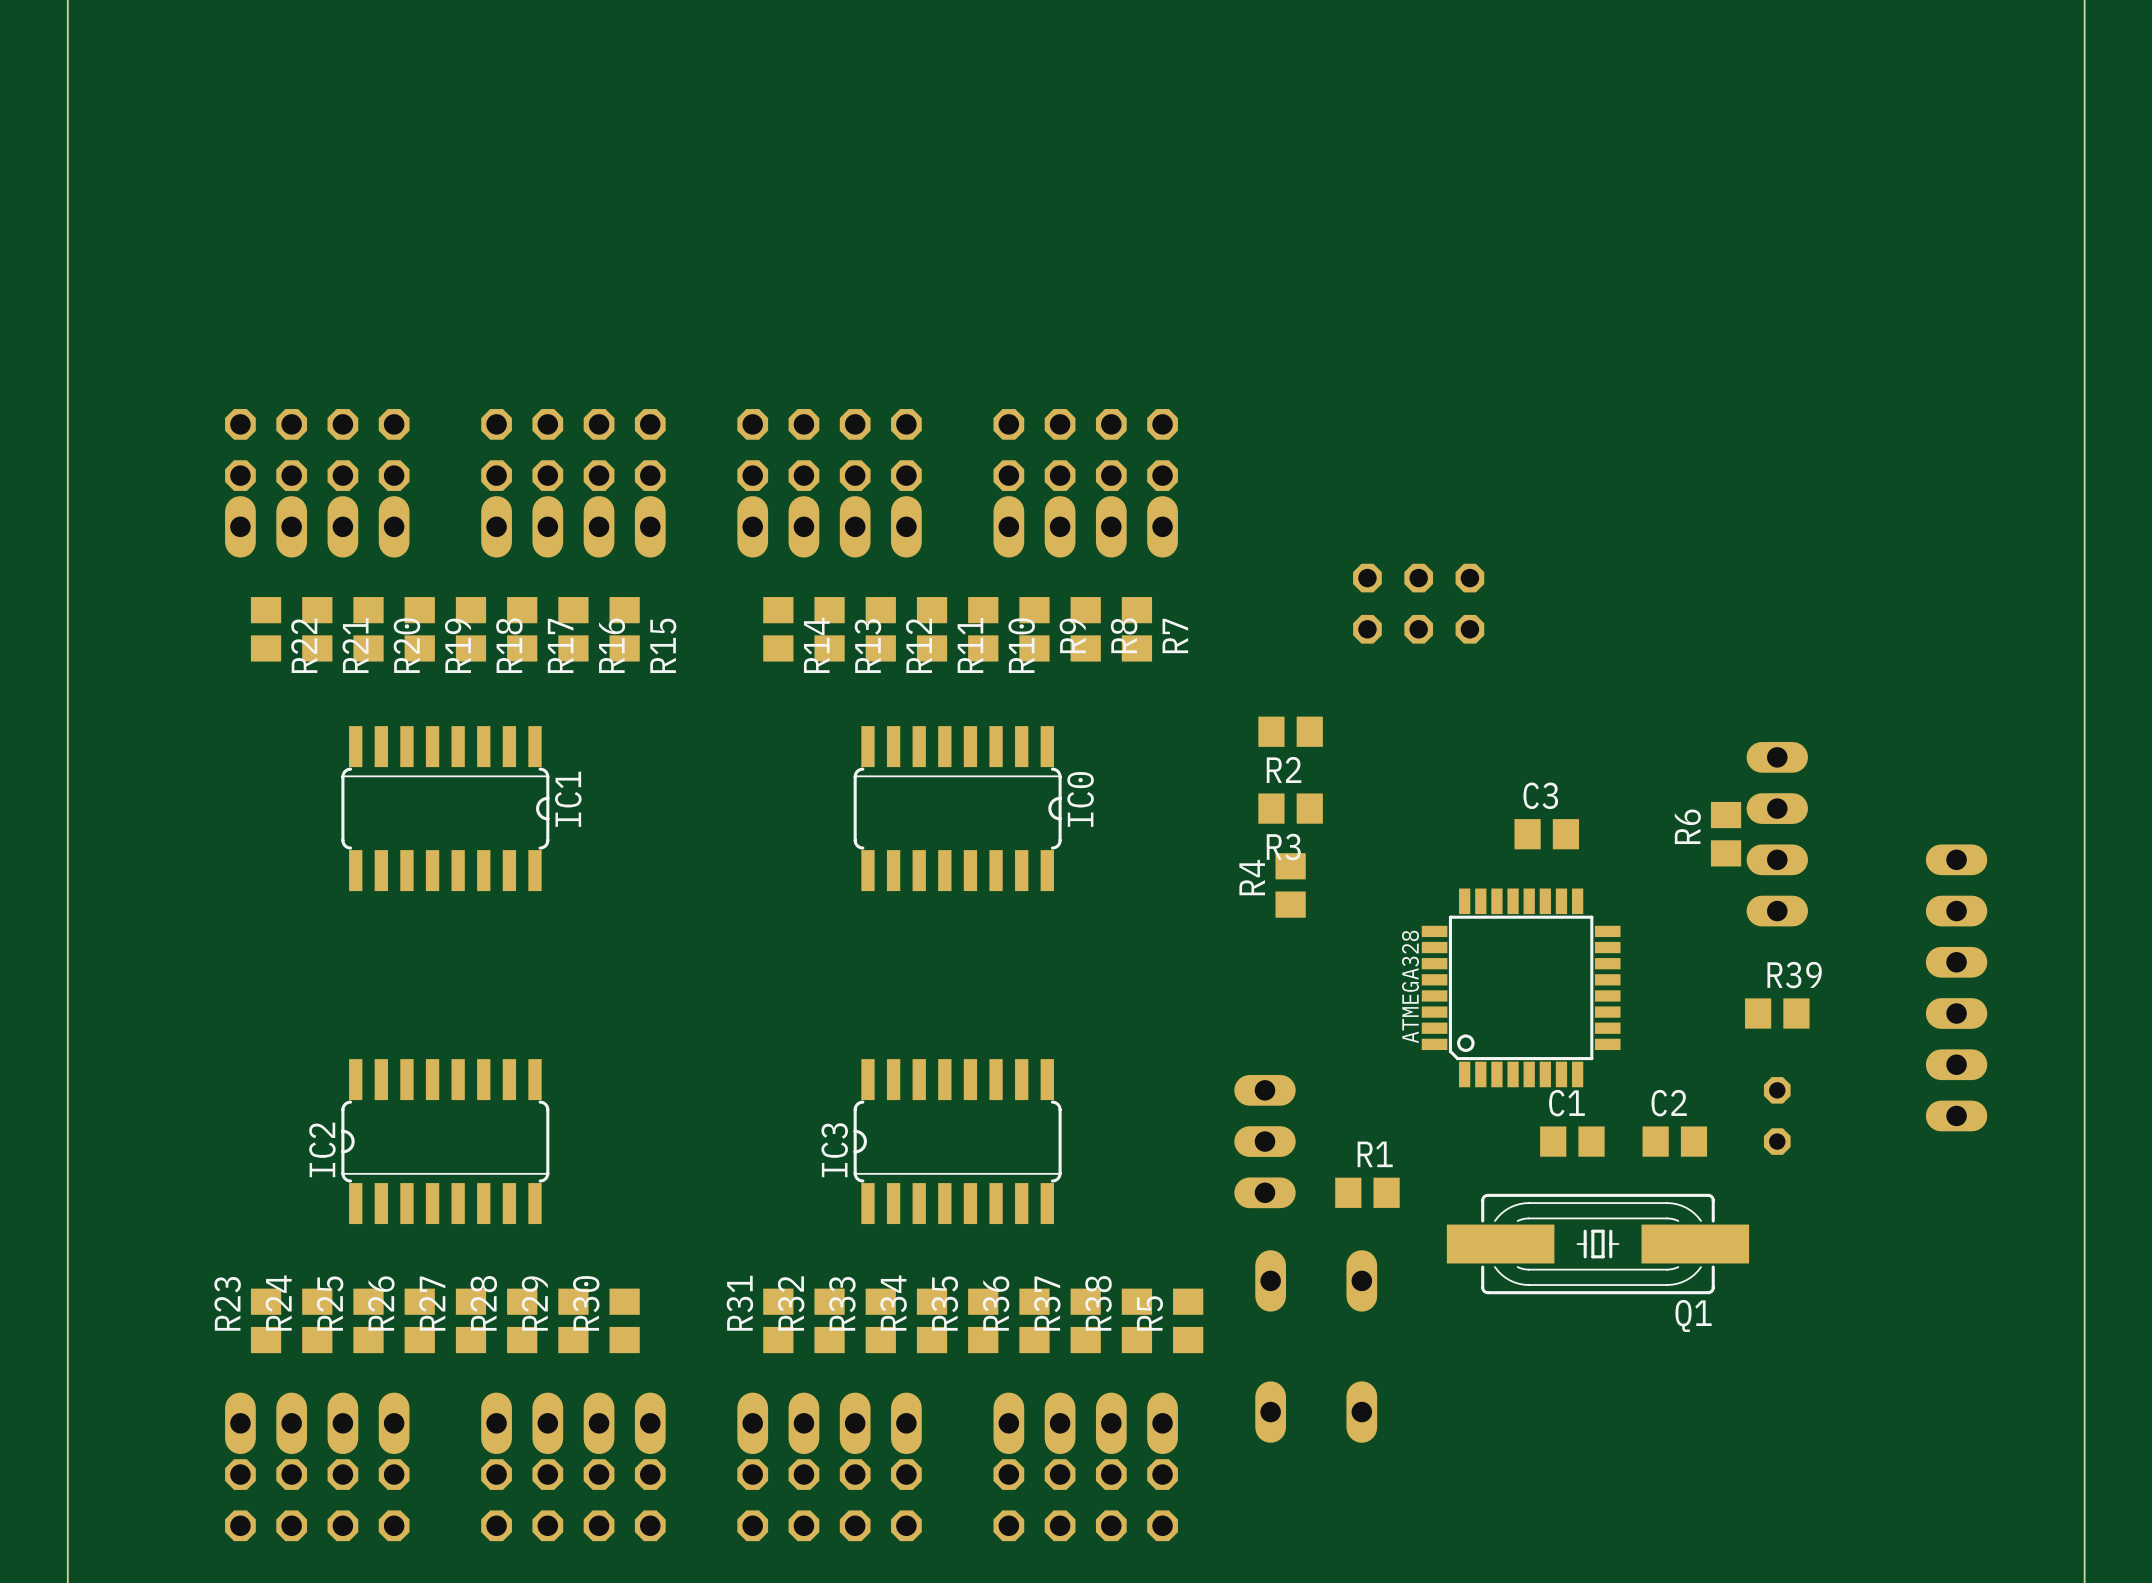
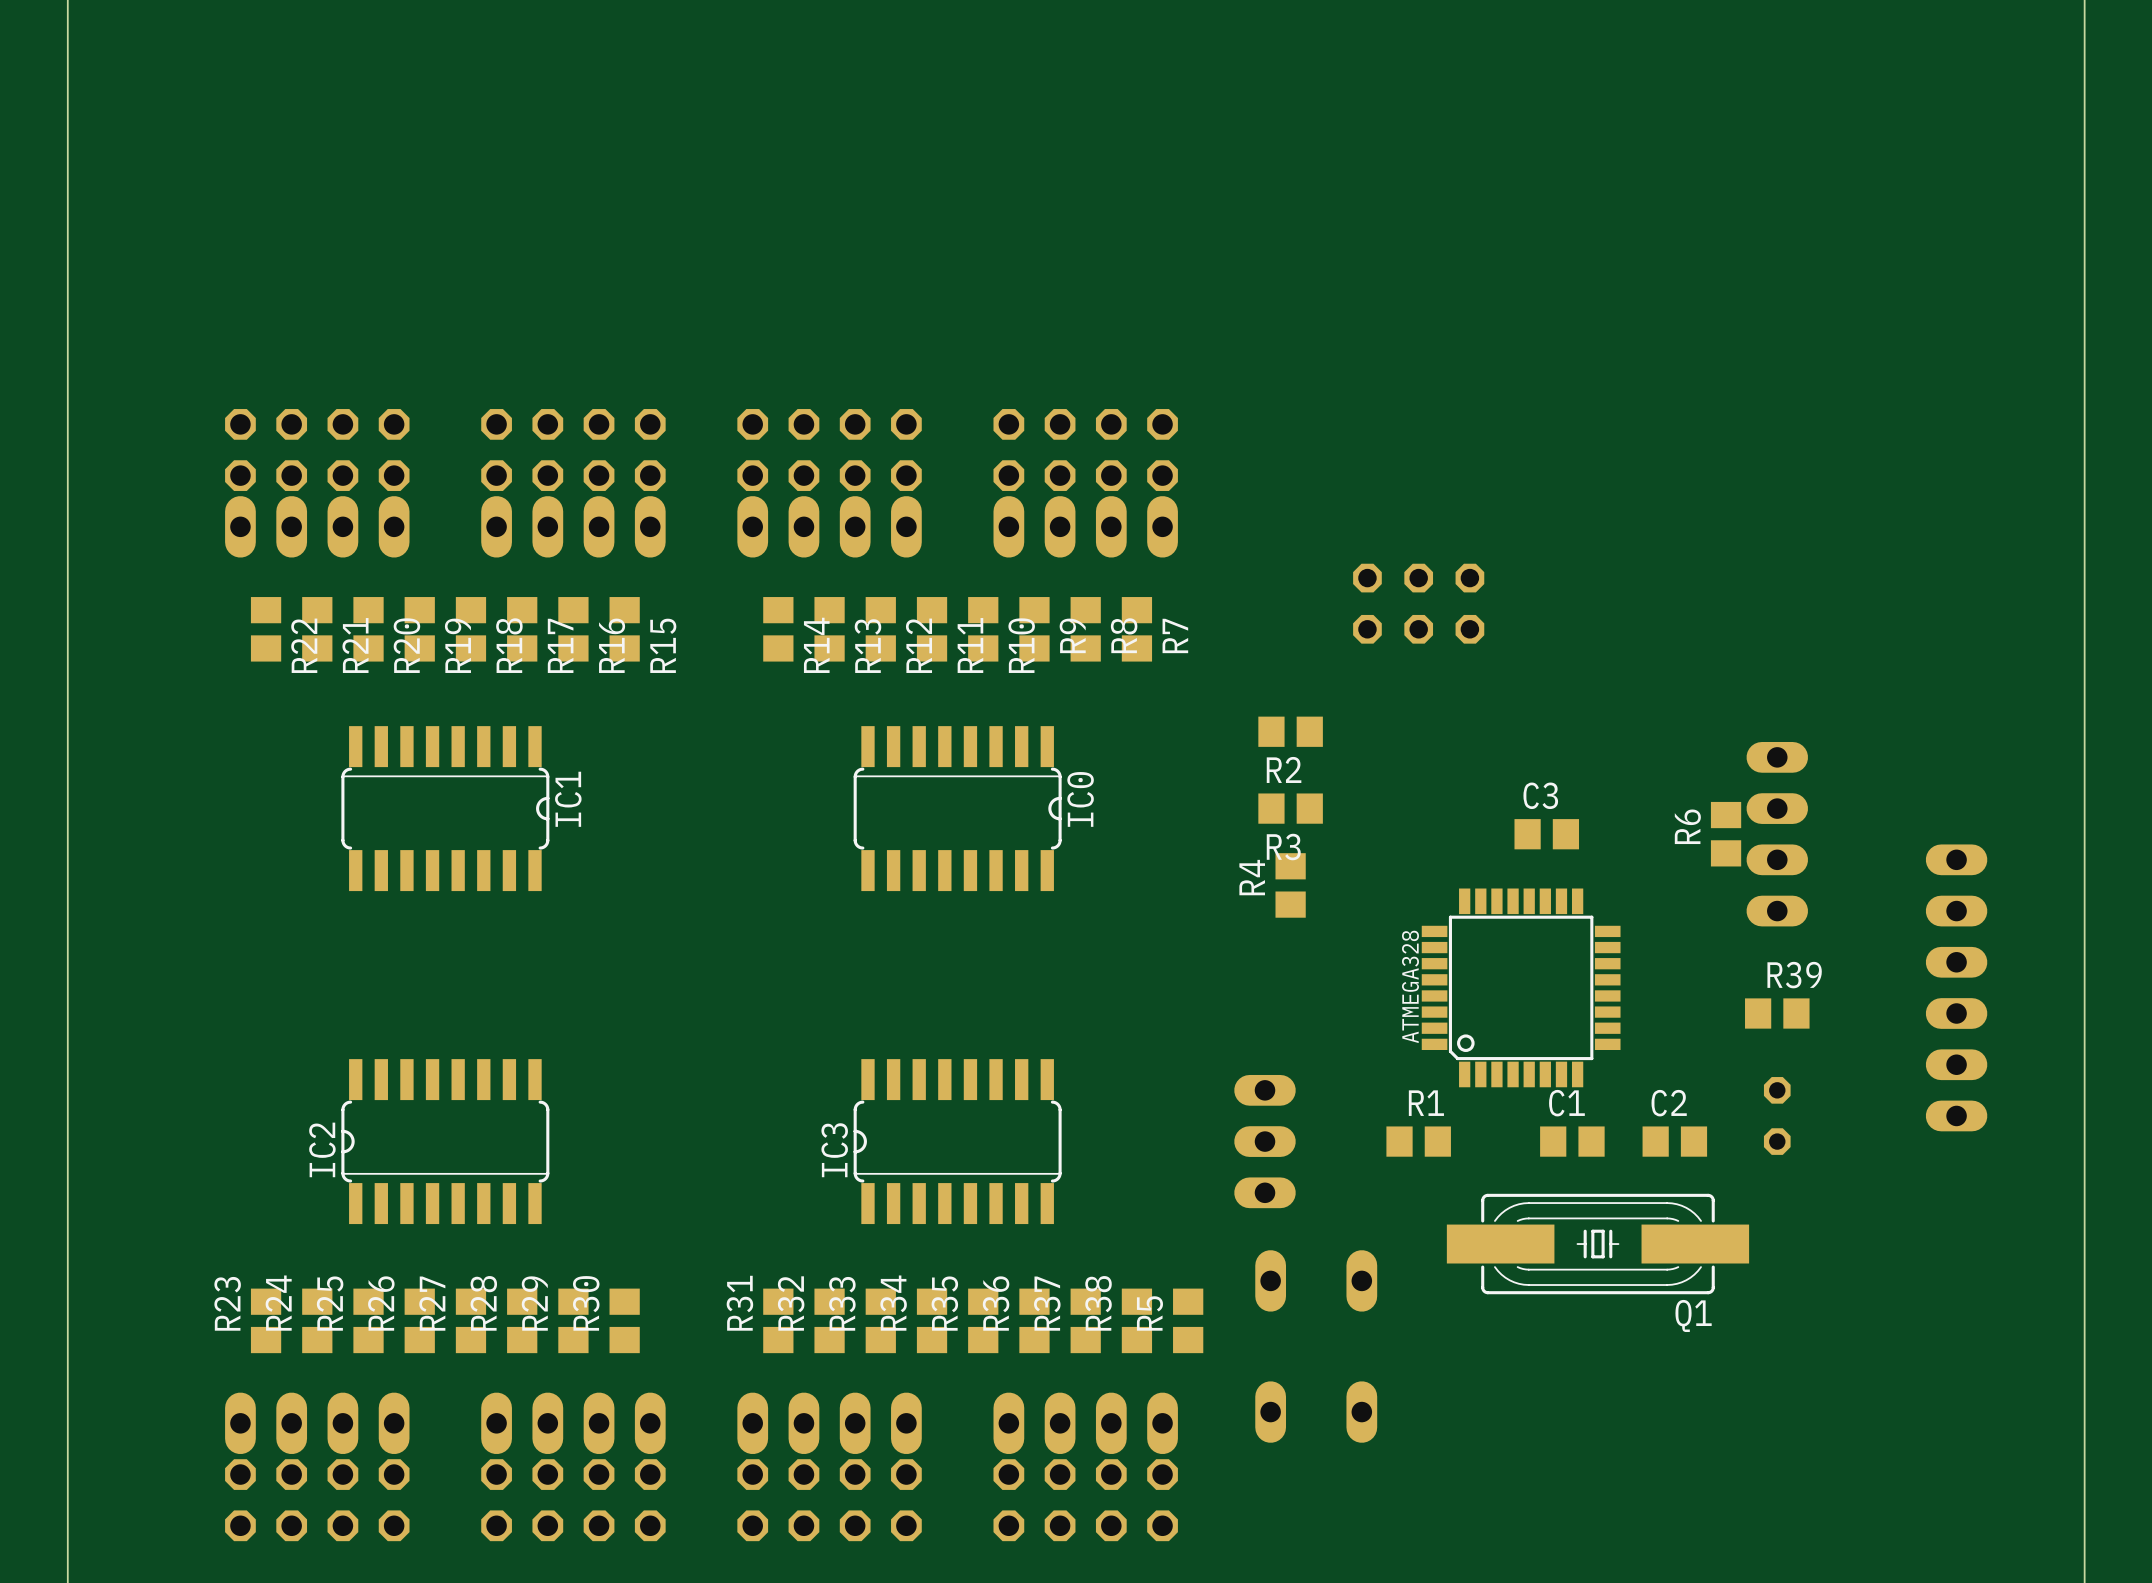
R1 position: (1367, 1192) -> (1418, 1141)

